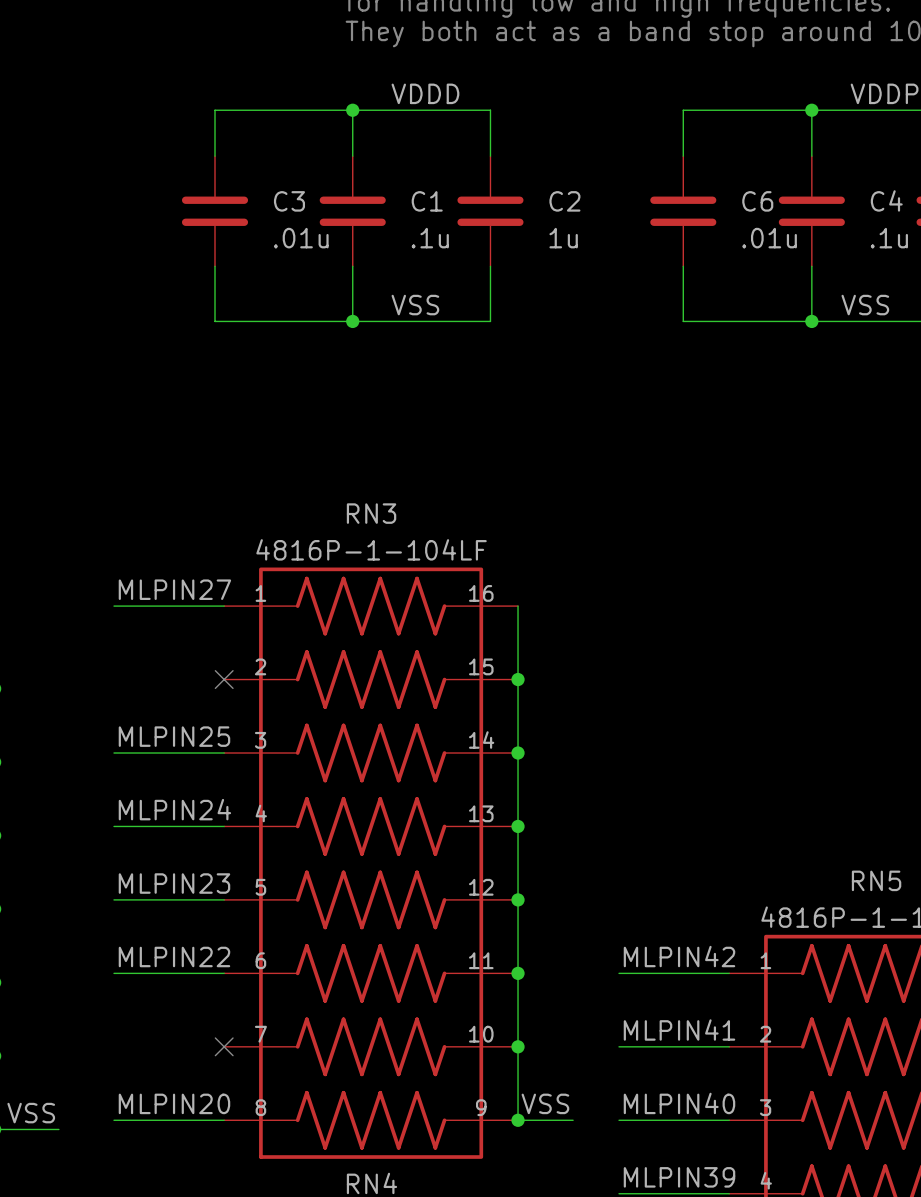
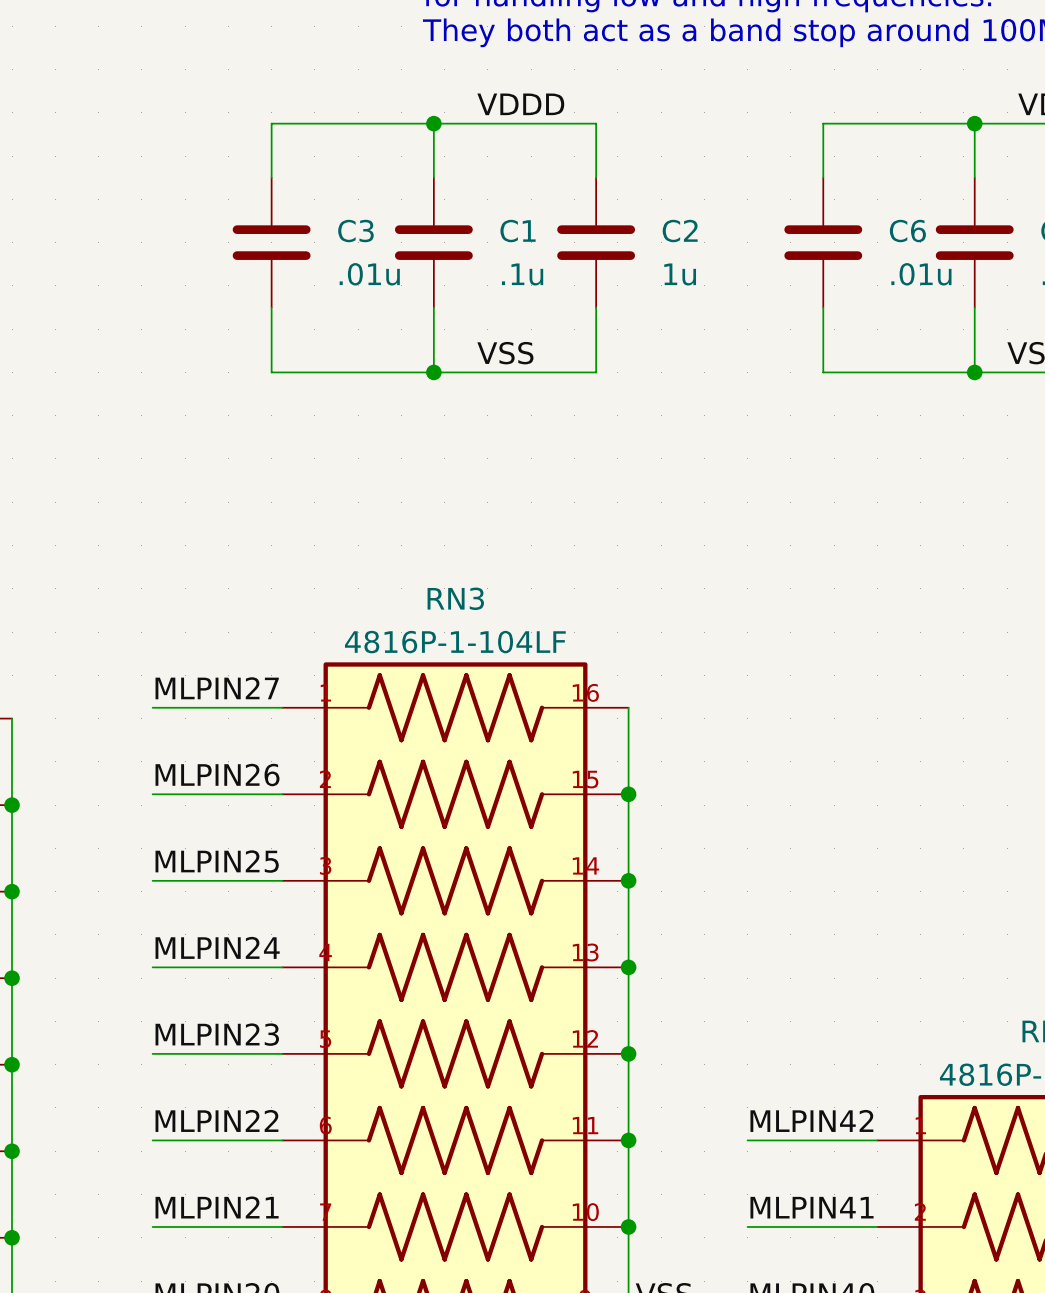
label: none -> MLPIN26 (217, 775)
wire: none -> (152, 794) (282, 794)
no-connect mark: (224, 679) -> none
label: none -> MLPIN21 (217, 1207)
wire: none -> (152, 1226) (282, 1226)
no-connect mark: (224, 1046) -> none

